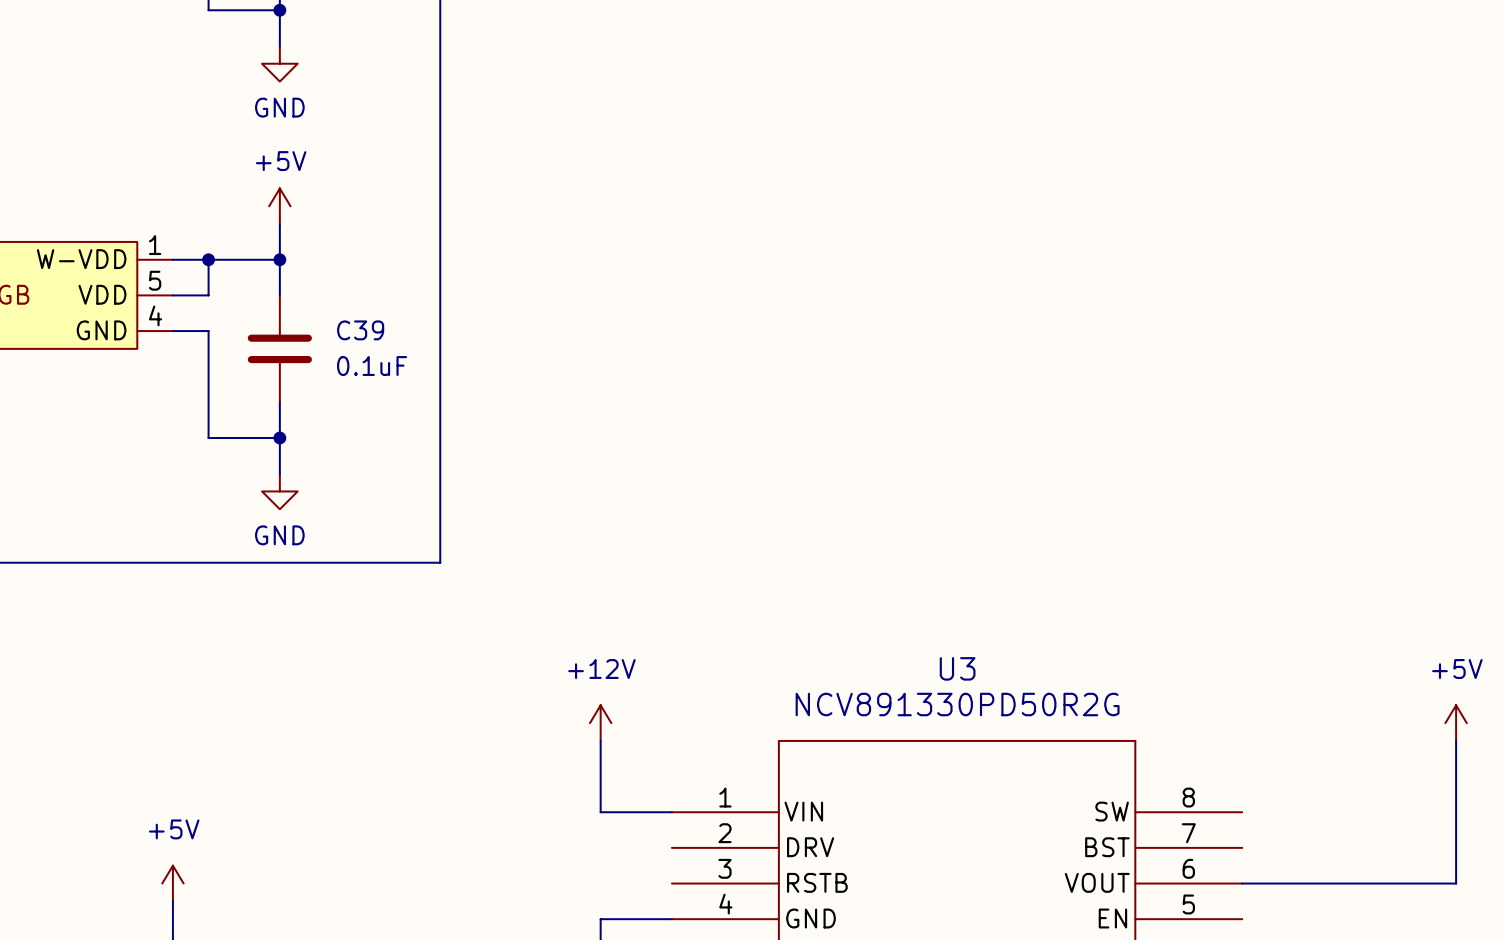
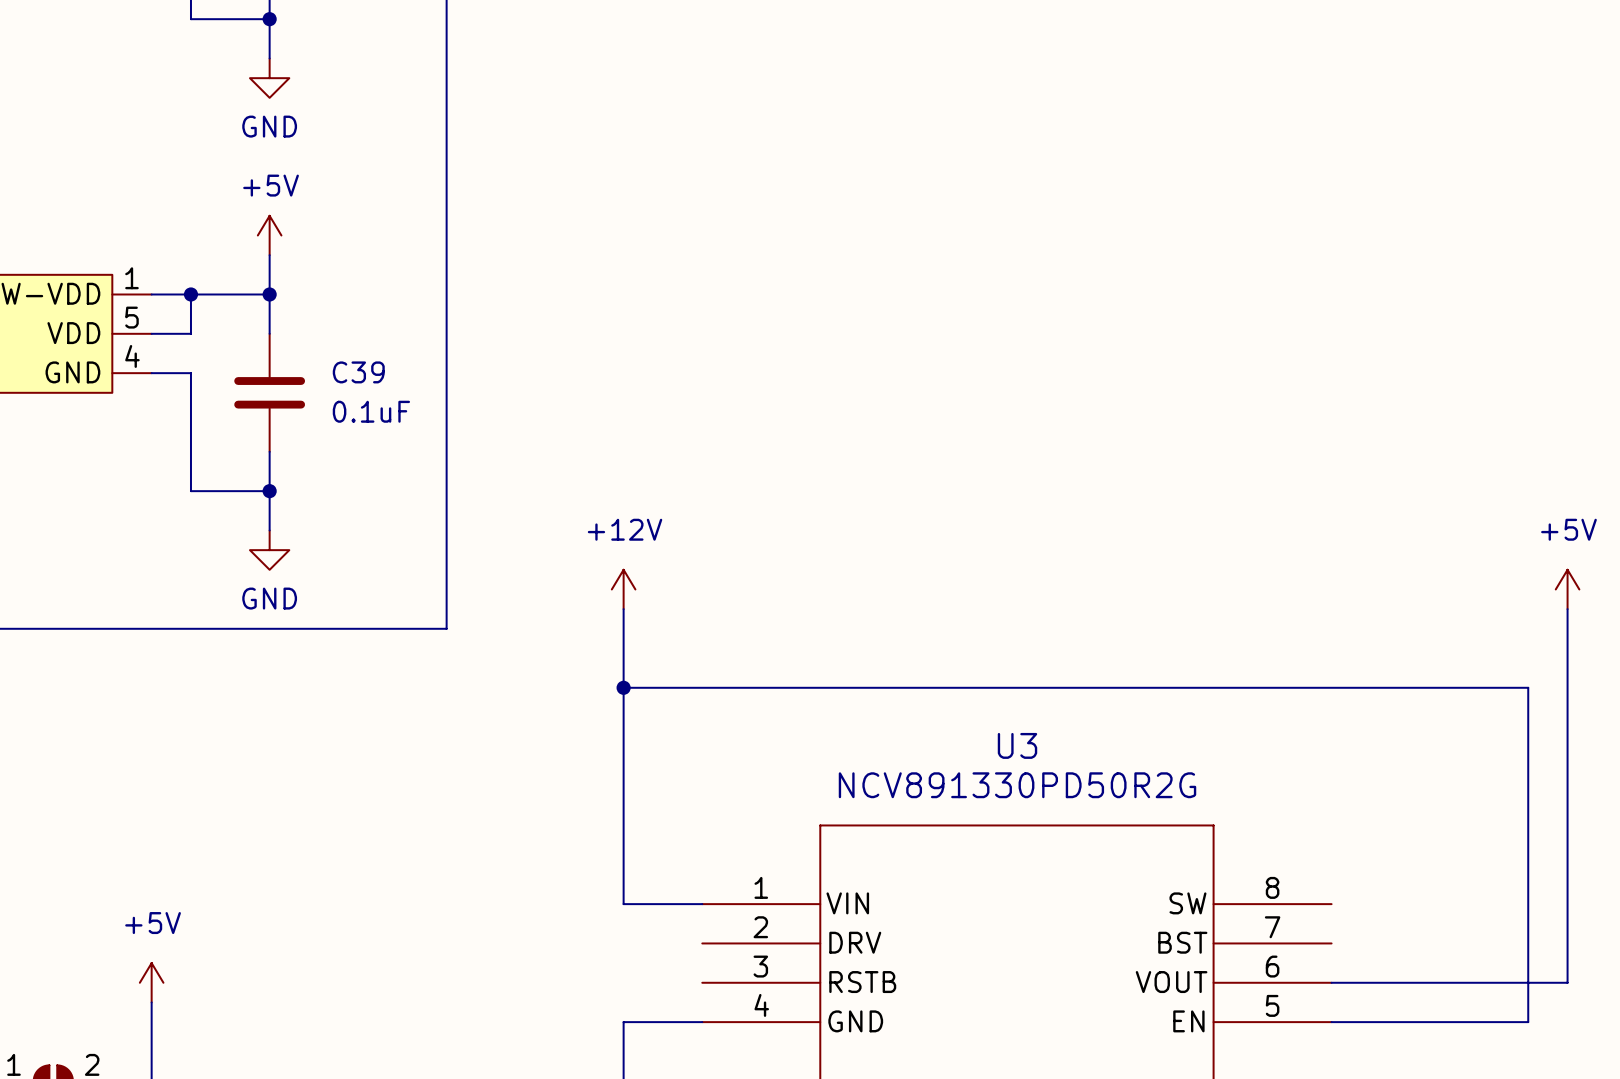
wire: none -> (623, 609) (623, 825)
wire: none -> (1567, 609) (1567, 825)
wire: none -> (623, 687) (1528, 687) (1528, 1022) (1331, 1022)
junction: none -> (623, 687)
power symbol position: +12V (600, 723) -> +12V (623, 589)
power symbol position: +5V (1456, 723) -> +5V (1567, 589)

